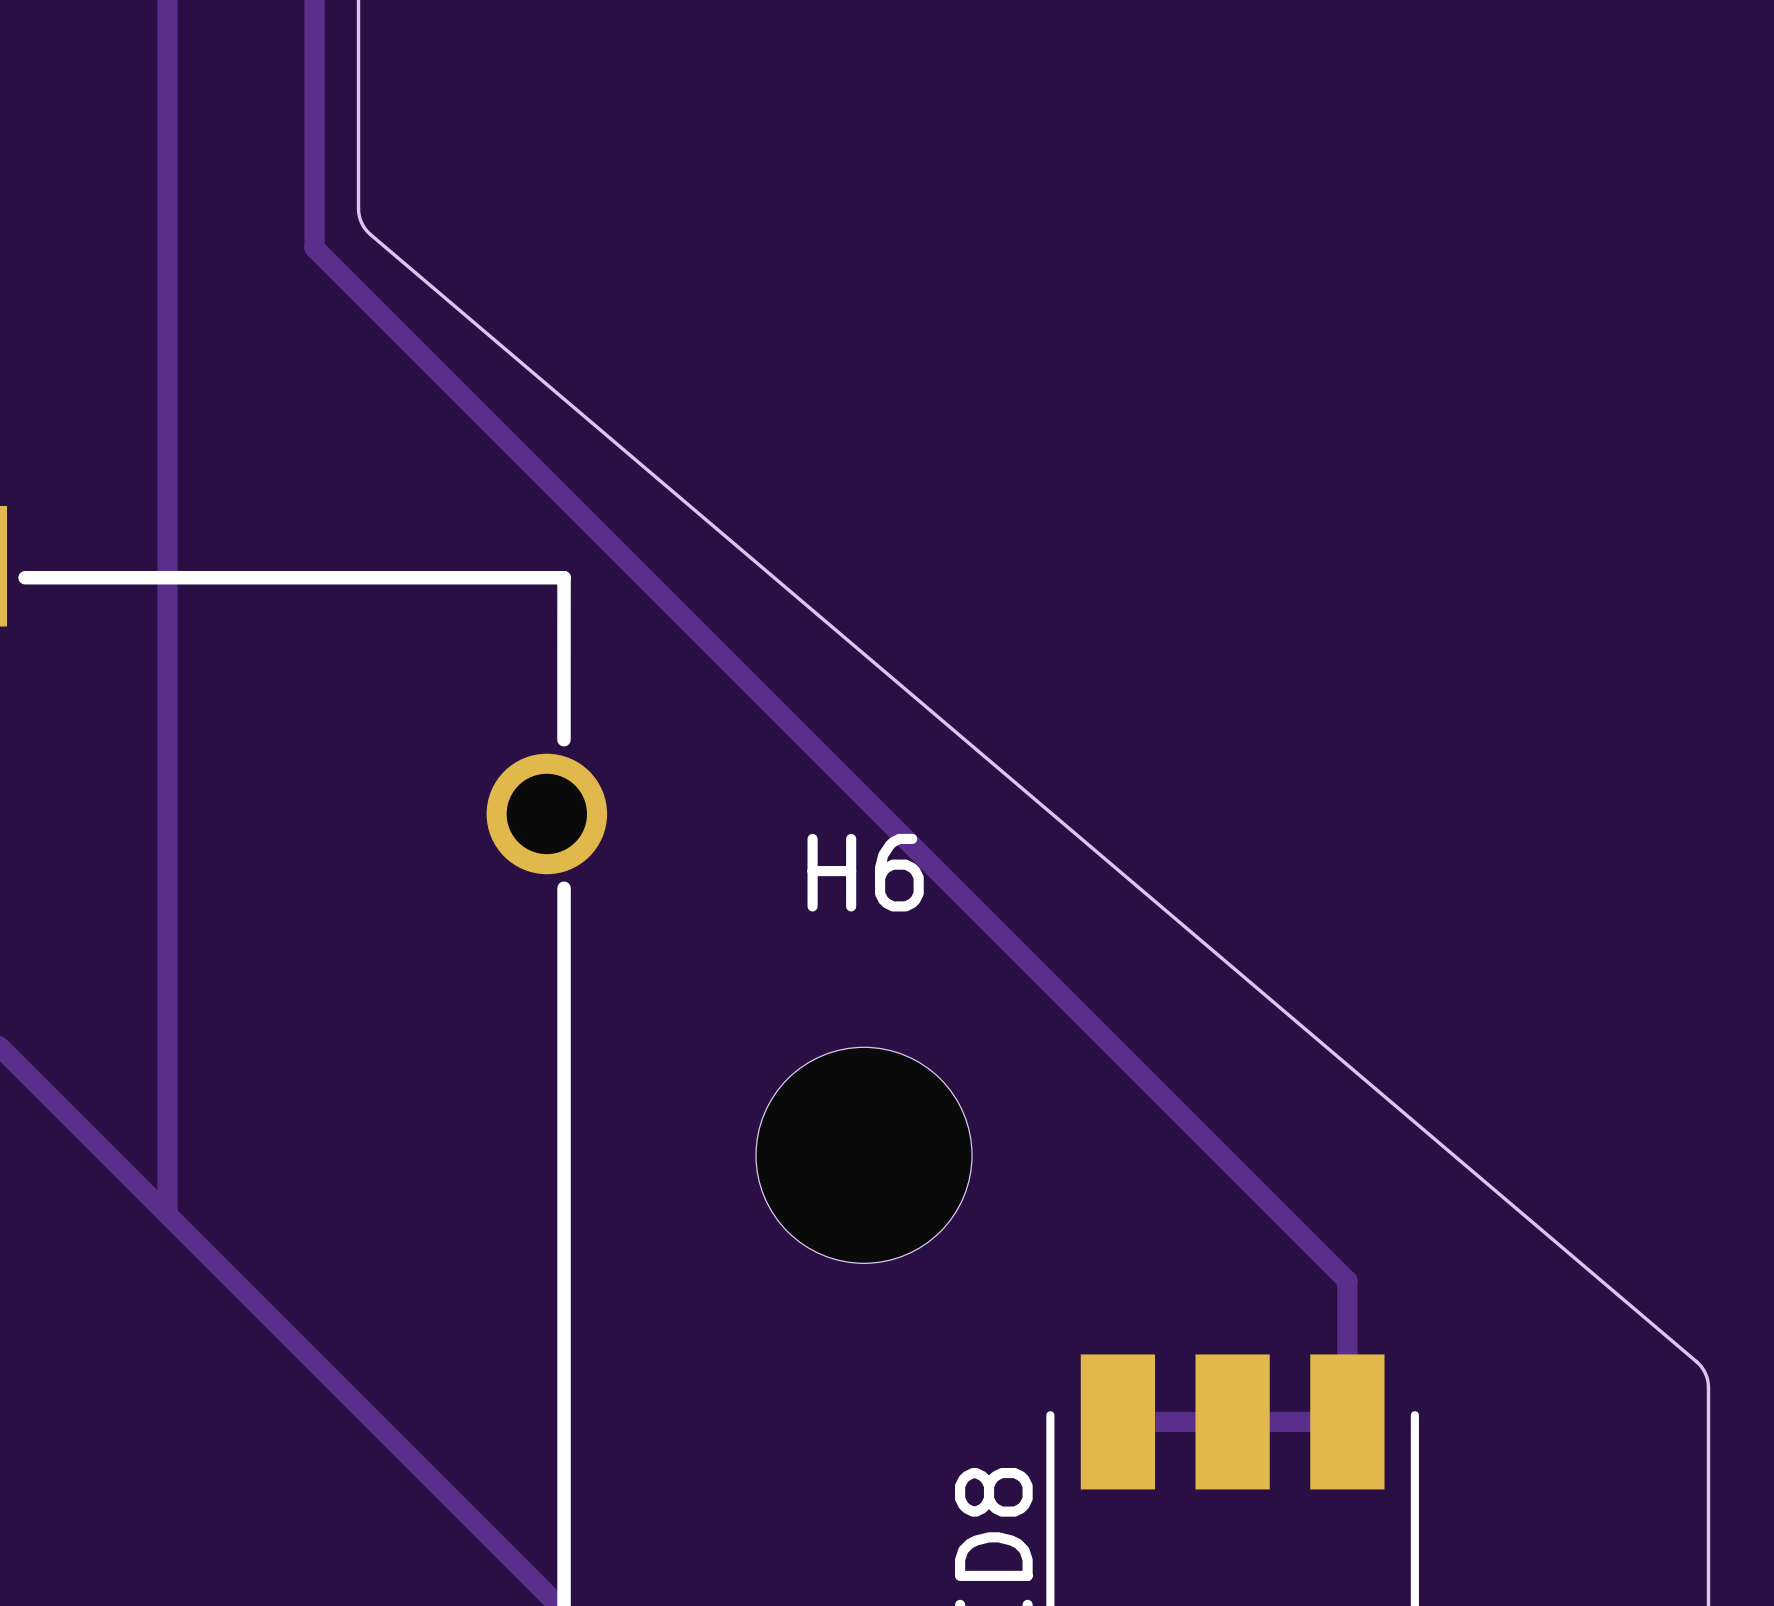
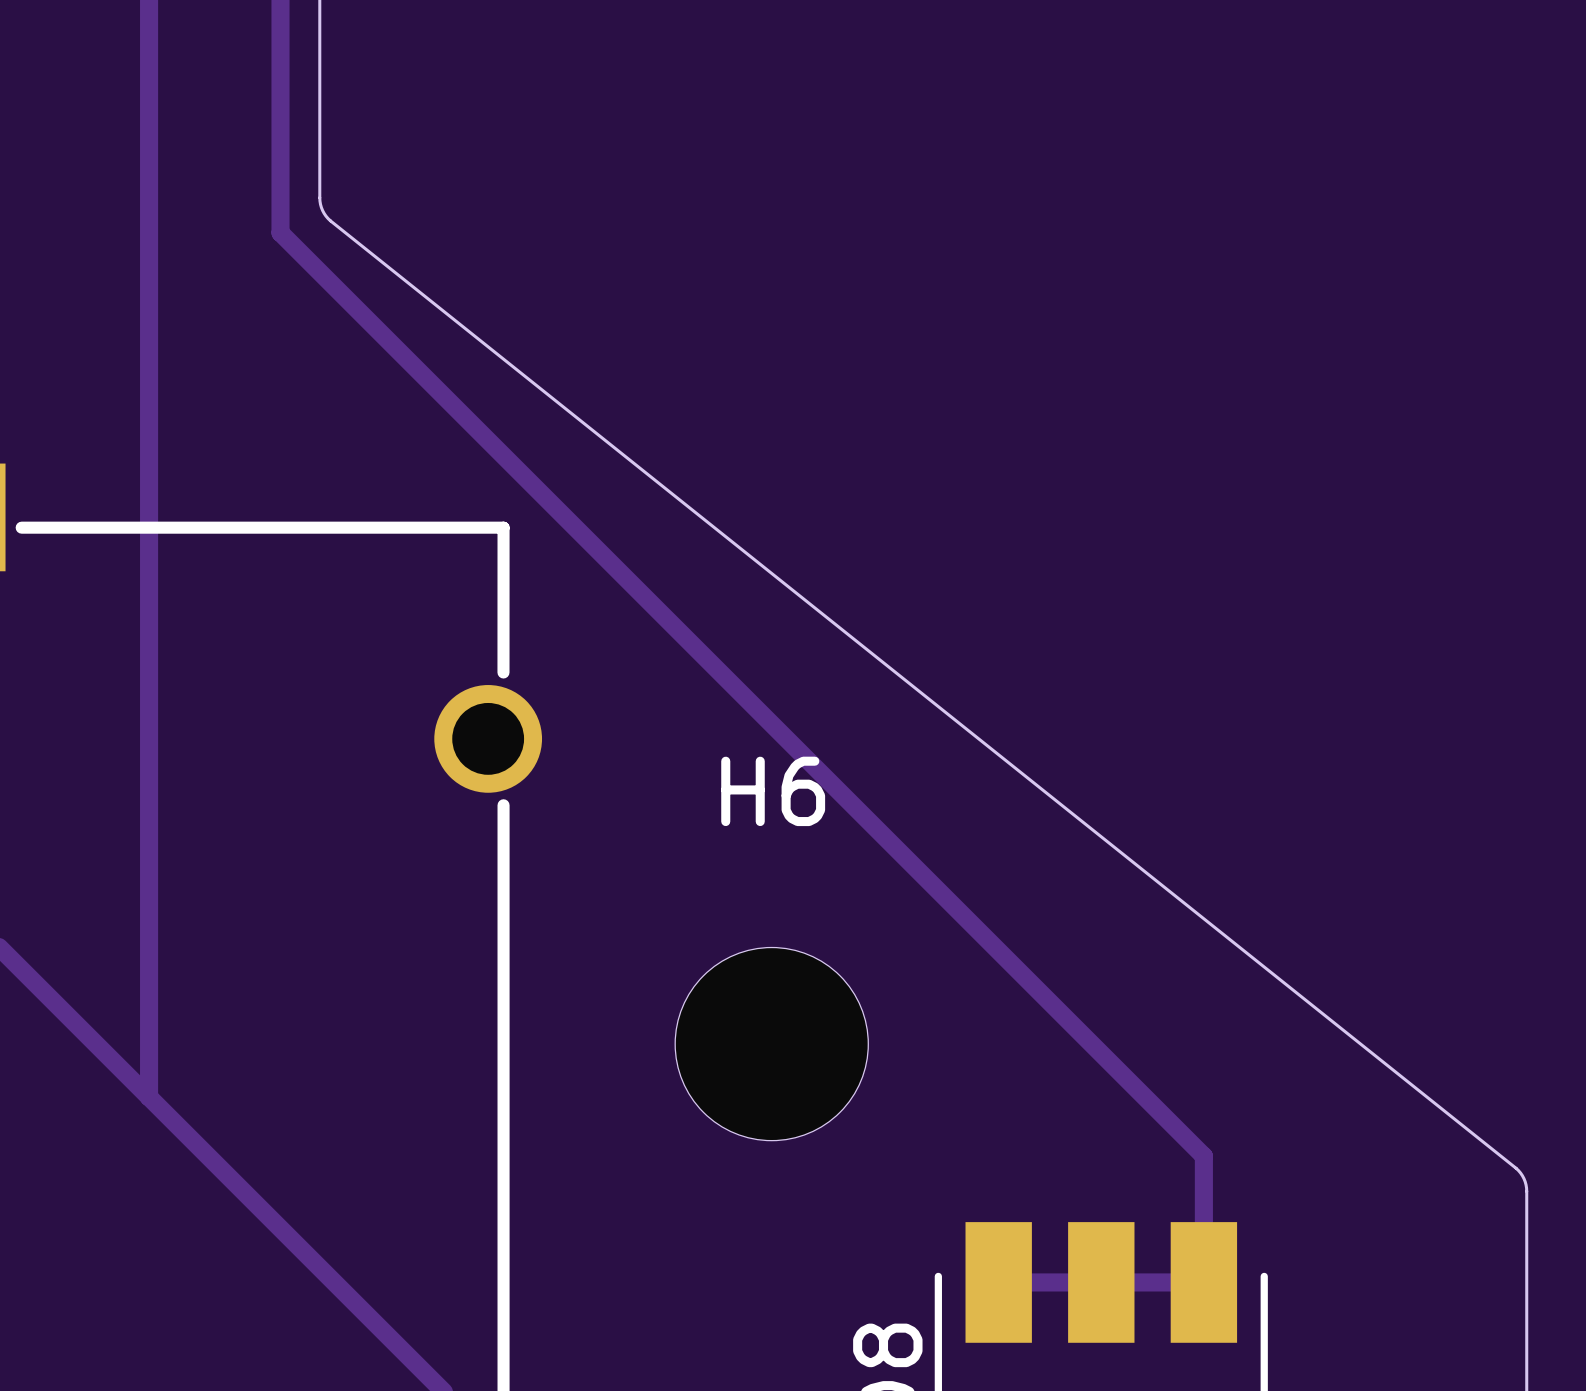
board edge: (370, 234) (1696, 1361) (1705, 1373) (1708, 1387) -> (330, 220) (1516, 1168) (1522, 1175) (1526, 1188) (1526, 1251)

